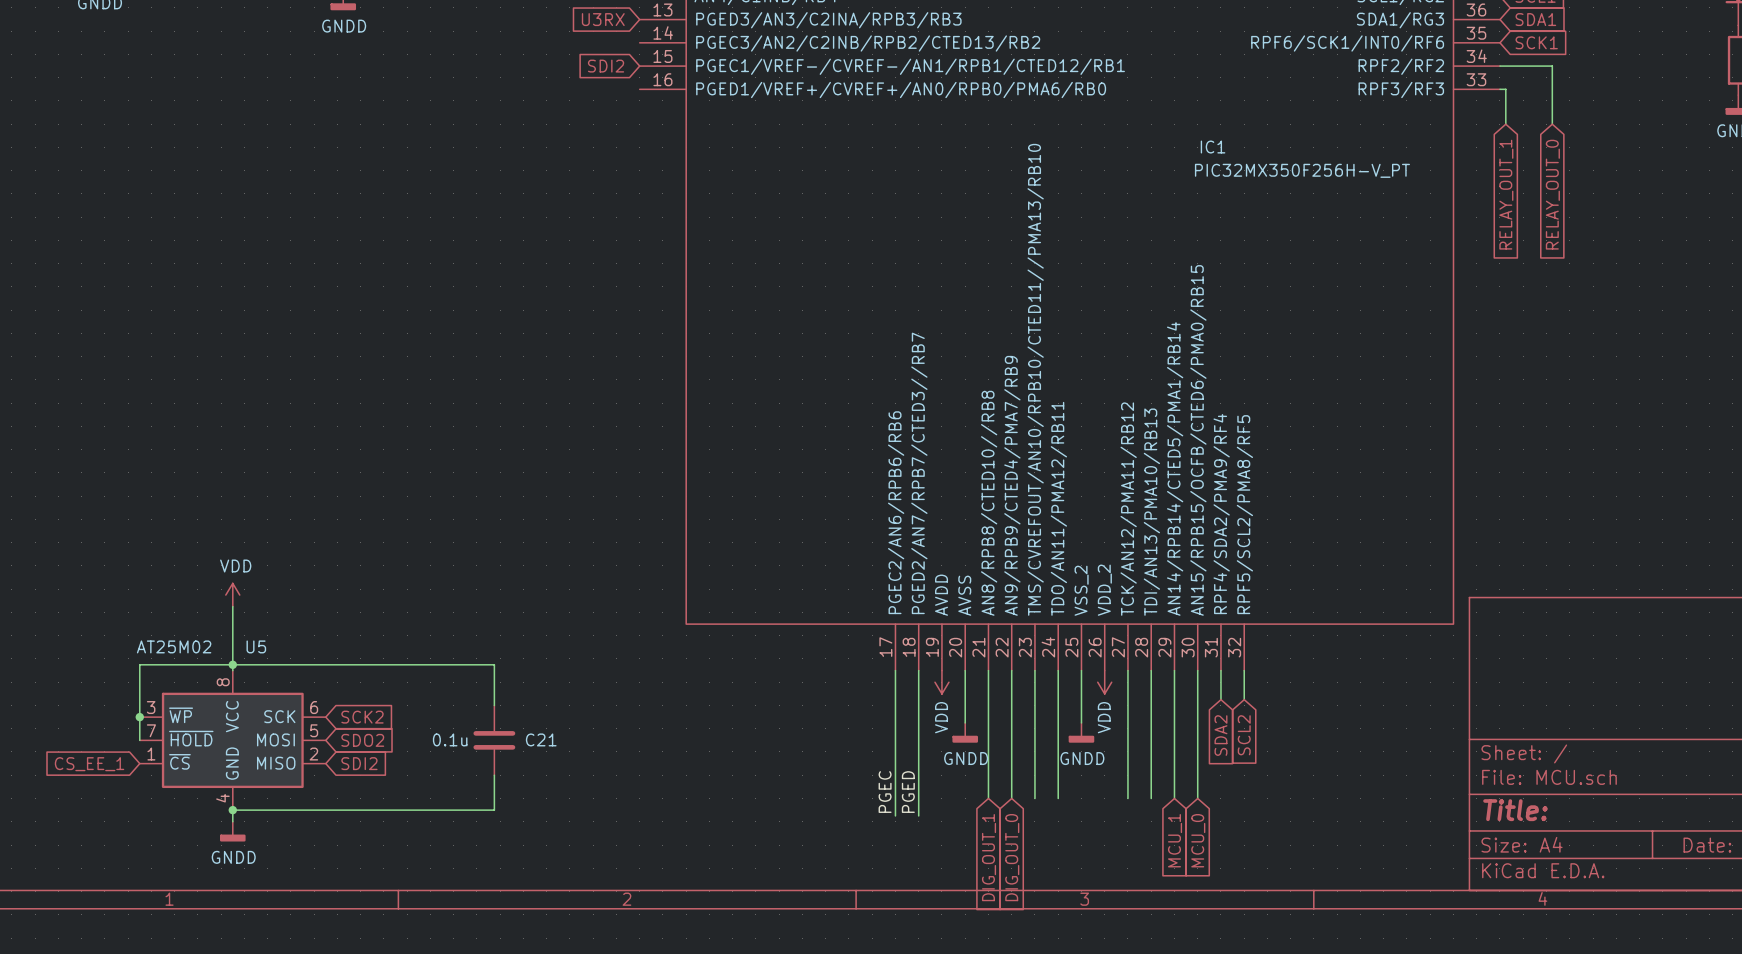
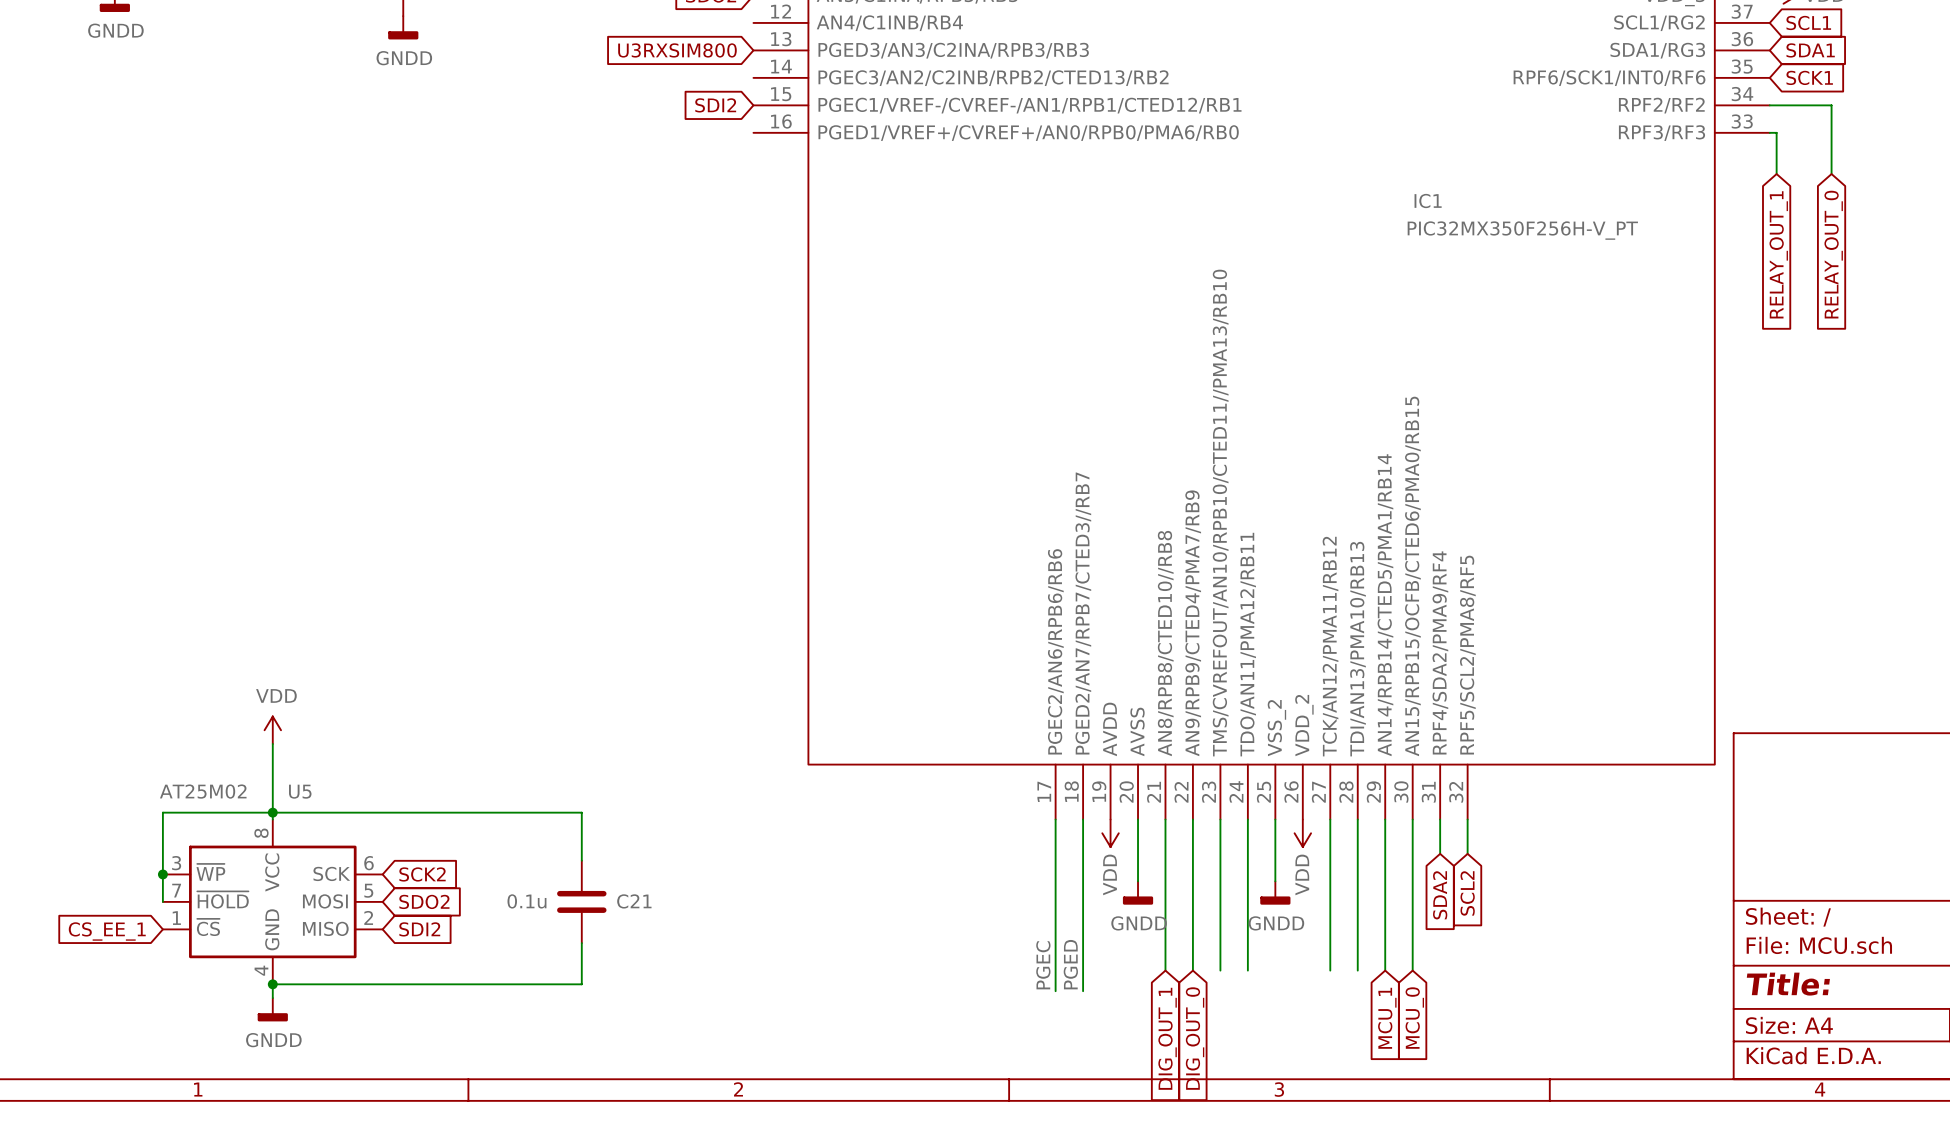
global label: U3RX (603, 19) -> U3RXSIM800 (677, 50)

